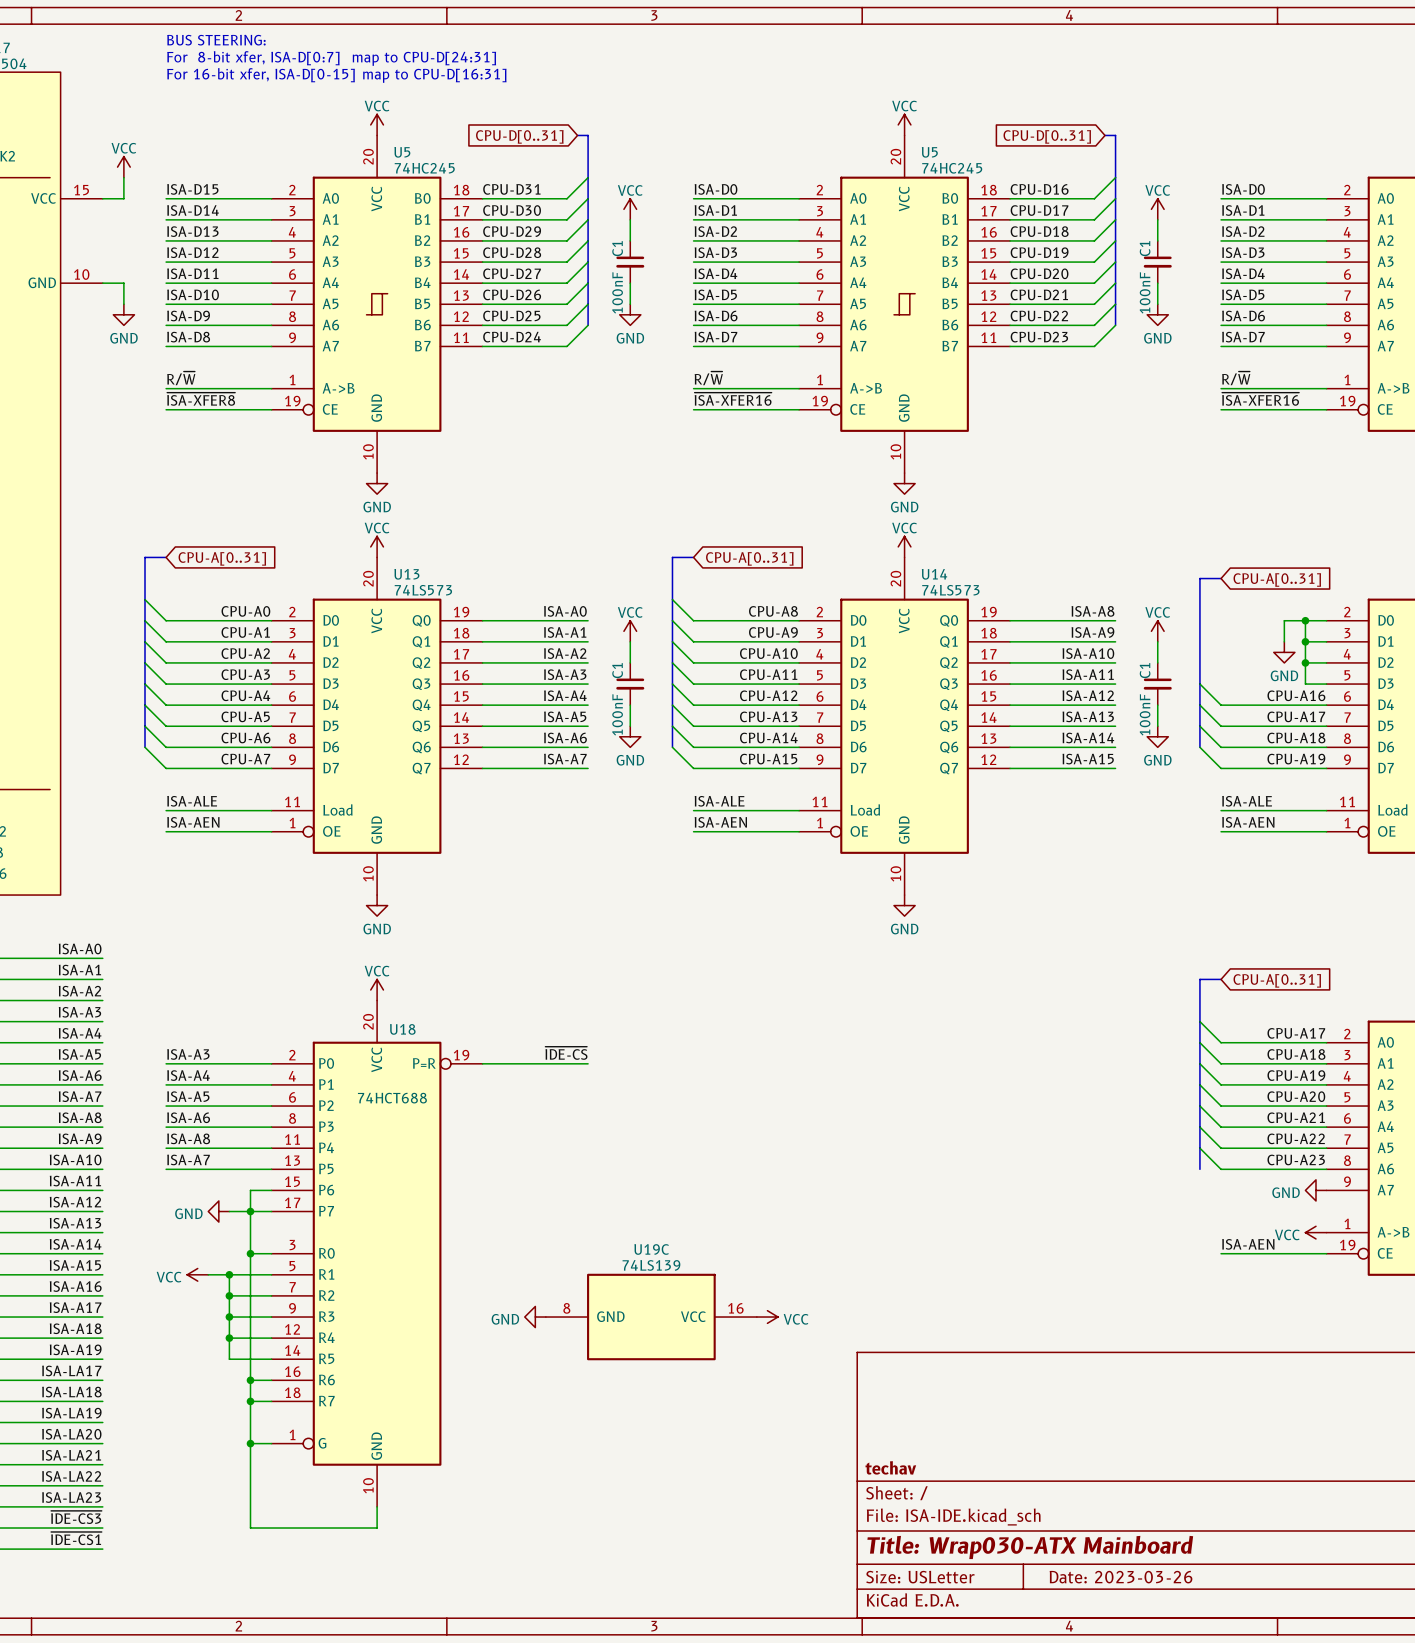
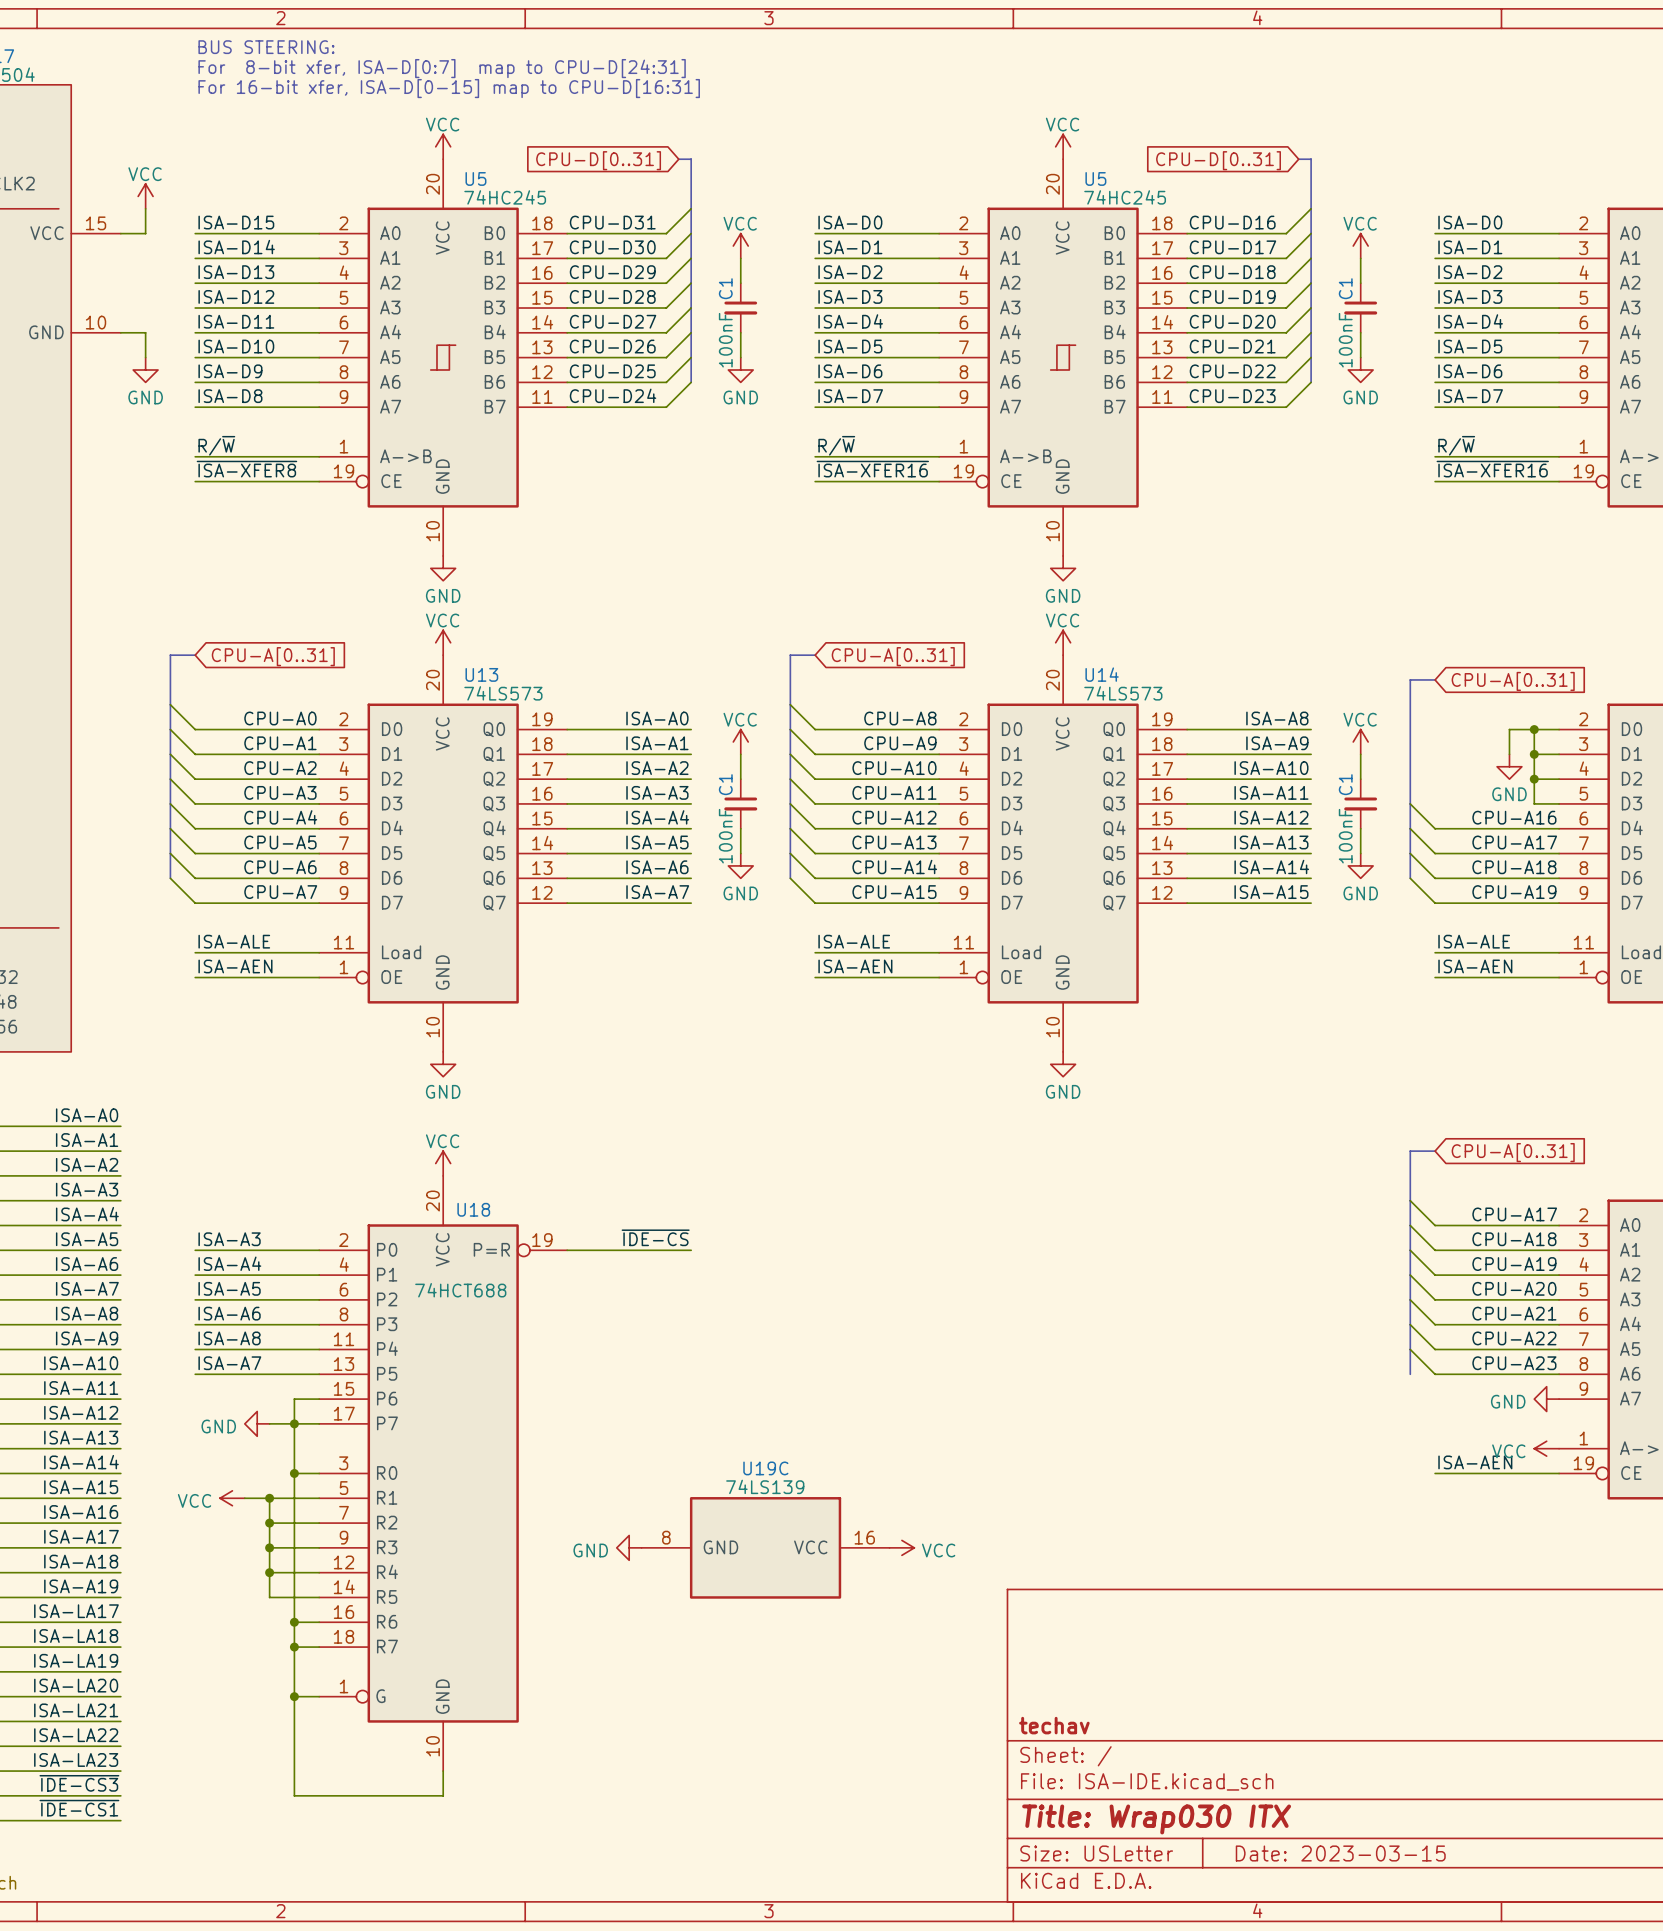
title block: Title: Wrap030-ATX Mainboard (1030, 1547) -> Title: Wrap030 ITX (1156, 1819)
title block: Date: 2023-03-26 (1121, 1577) -> Date: 2023-03-15 (1340, 1853)

